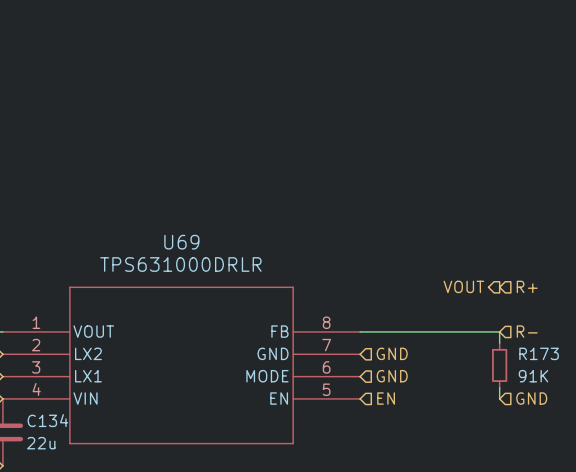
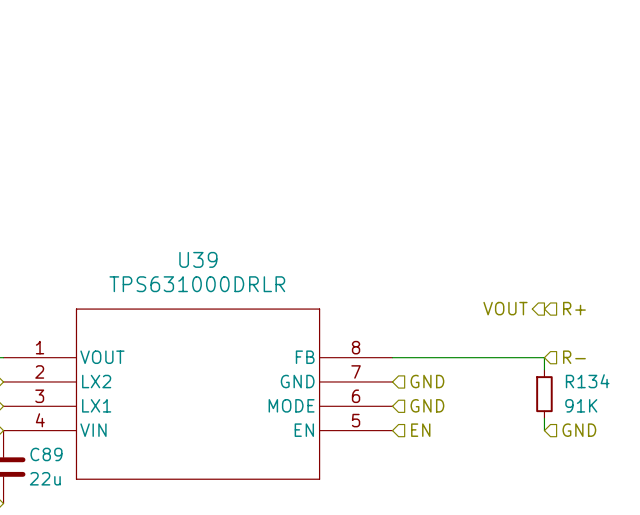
U69 name: U69 (181, 242) -> U39 (198, 259)
R173 name: R173 (539, 353) -> R134 (587, 381)
C134 name: C134 (47, 420) -> C89 (46, 454)

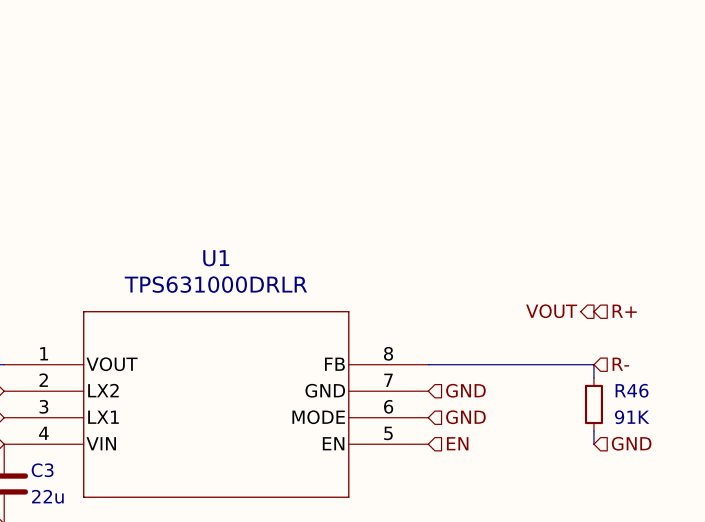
U39 name: U39 (198, 259) -> U1 (216, 258)
R134 name: R134 (587, 381) -> R46 (632, 390)
C89 name: C89 (46, 454) -> C3 (42, 470)

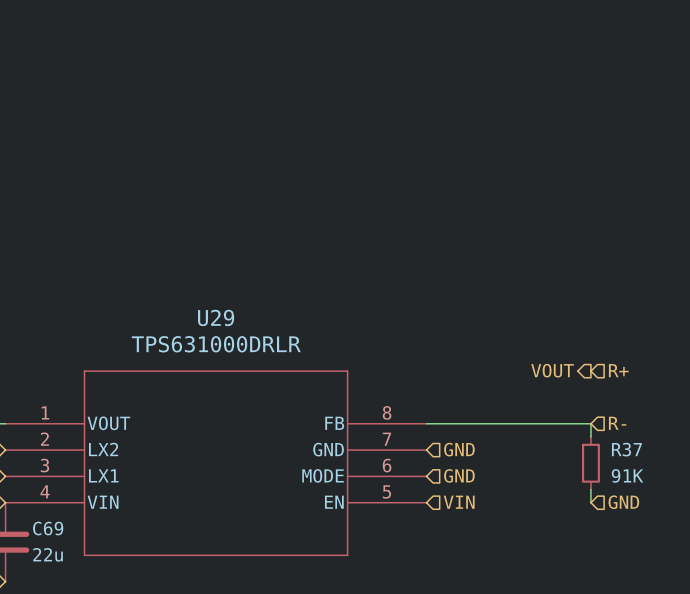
U1 name: U1 (216, 258) -> U29 (216, 317)
R46 name: R46 (632, 390) -> R37 (626, 449)
hierarchical label: EN (457, 443) -> VIN (459, 502)
C3 name: C3 (42, 470) -> C69 (48, 528)

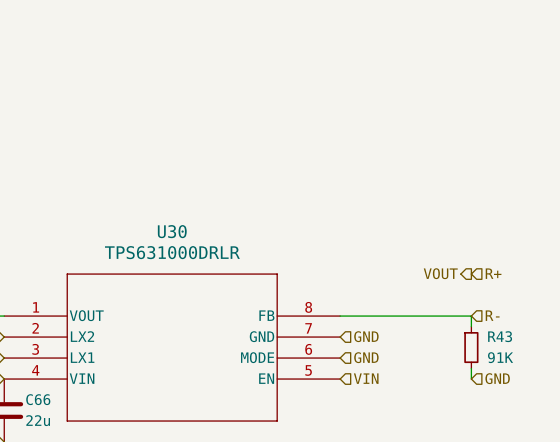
U29 name: U29 (216, 317) -> U30 (172, 231)
R37 name: R37 (626, 449) -> R43 (500, 336)
C69 name: C69 (48, 528) -> C66 (38, 399)

